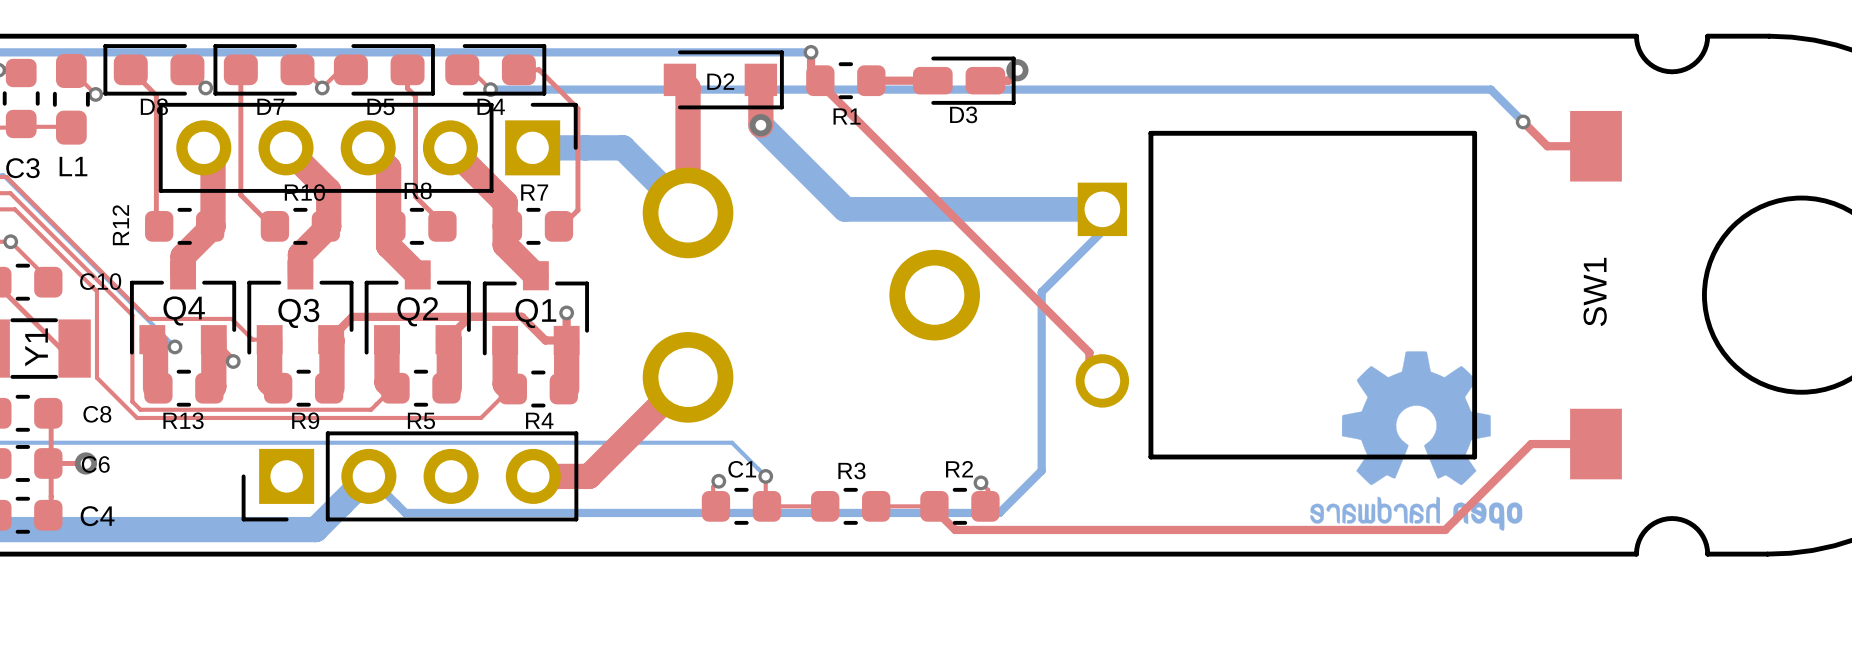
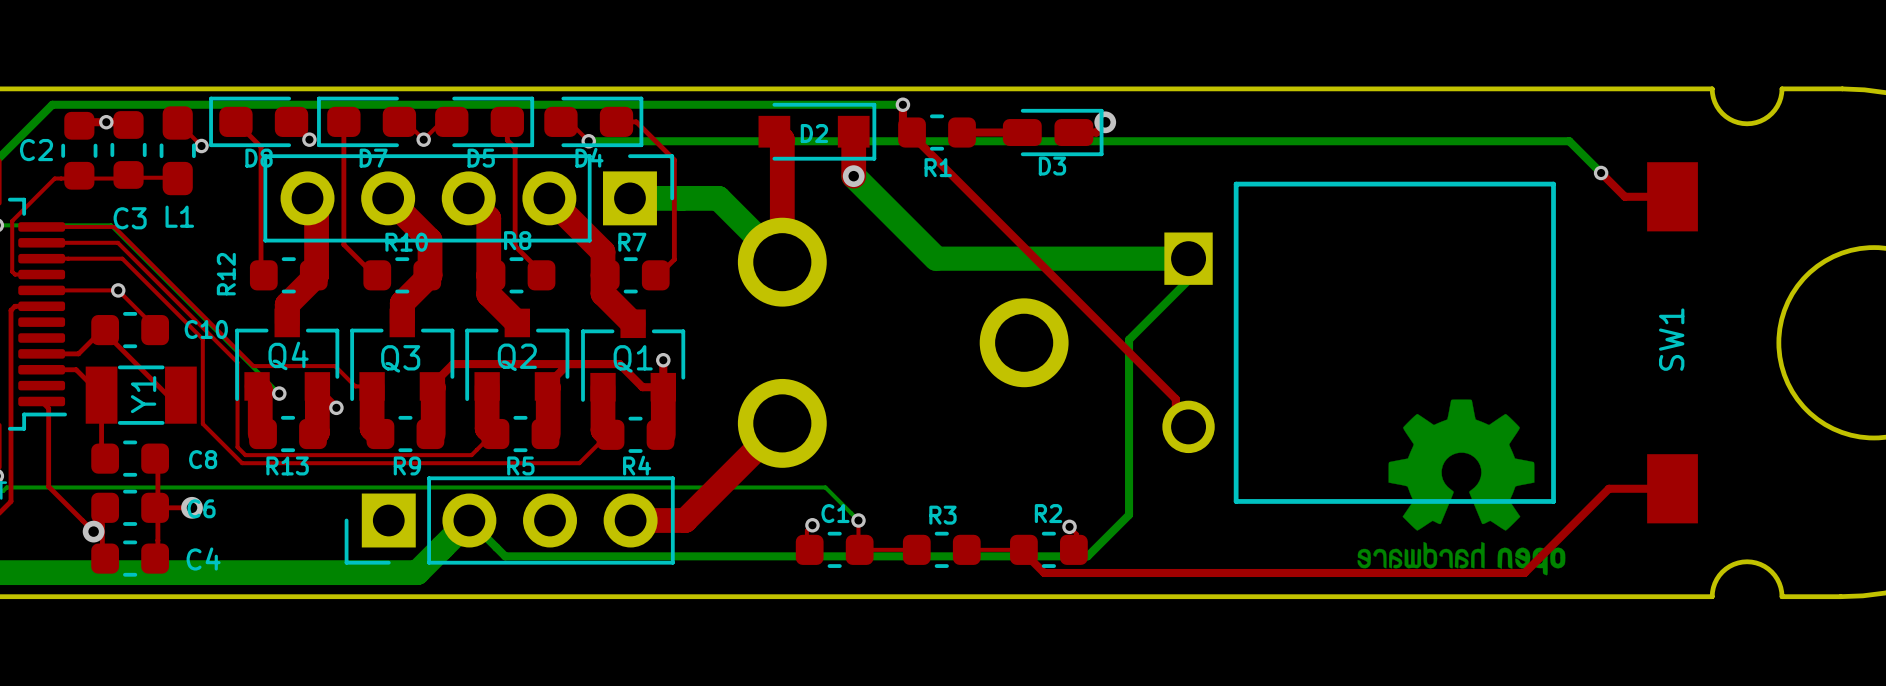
drawing position: (1416, 441) -> (1461, 487)

